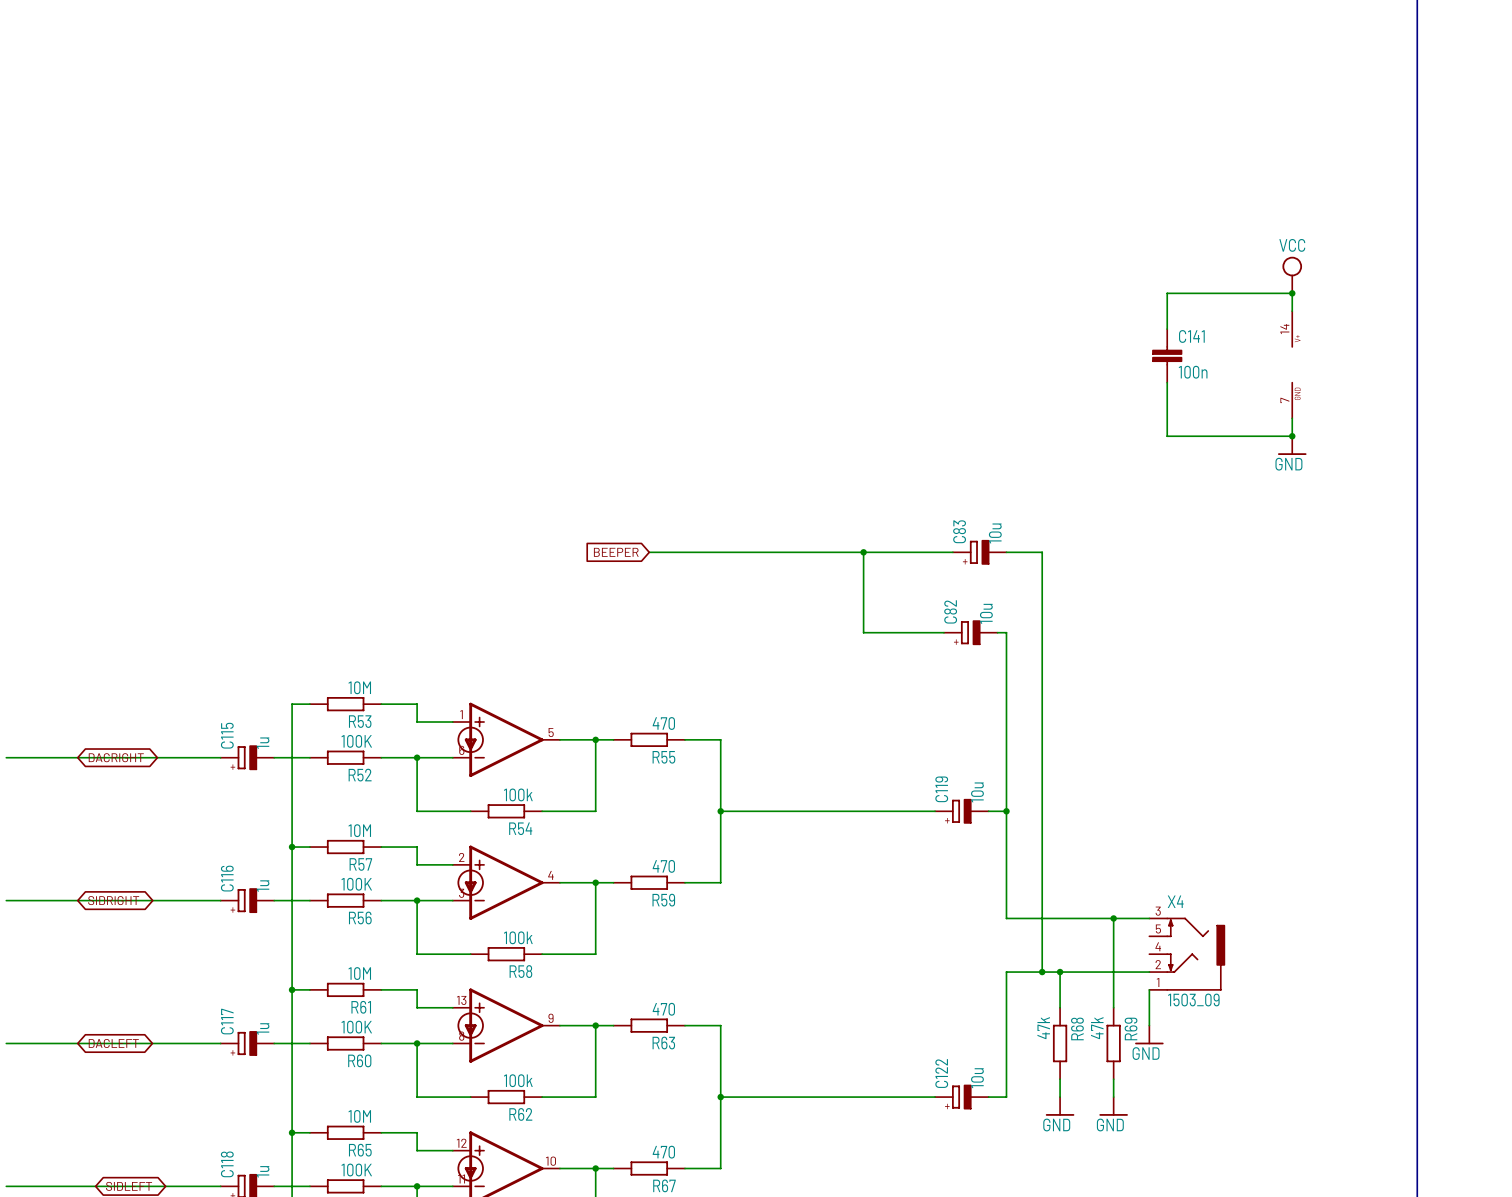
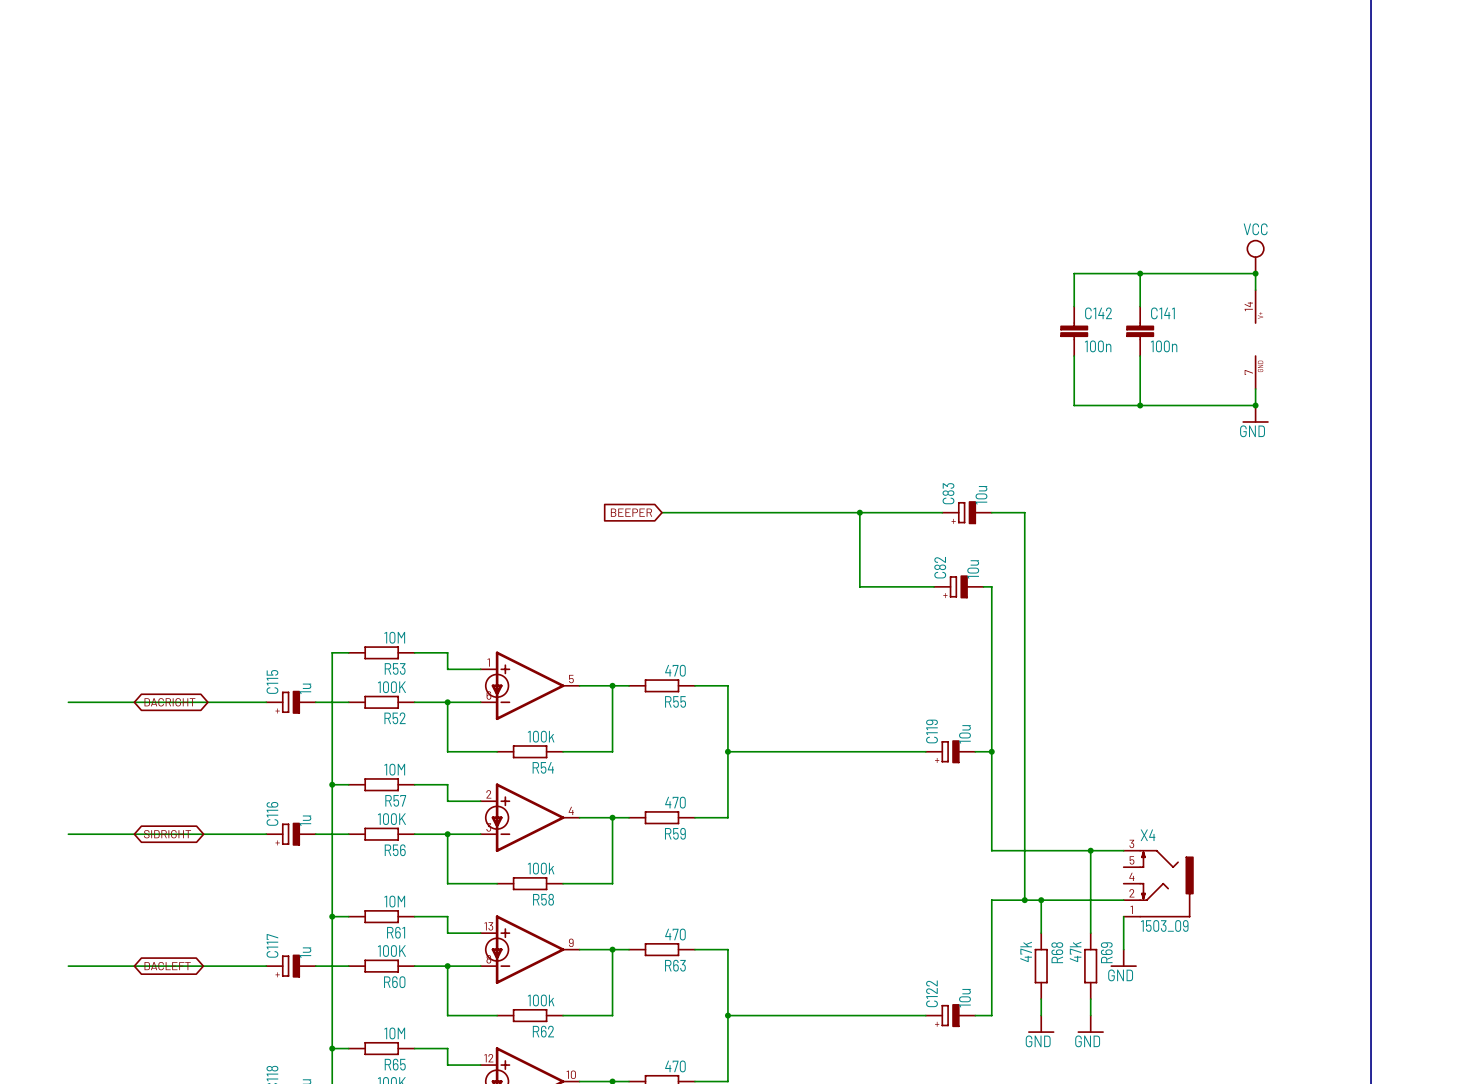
wire: none -> (1140, 273) (1074, 273) (1074, 306)
junction: none -> (1140, 273)
C142: none -> 100n (1074, 331)
wire: none -> (1074, 356) (1074, 405) (1140, 405)
junction: none -> (1140, 405)

